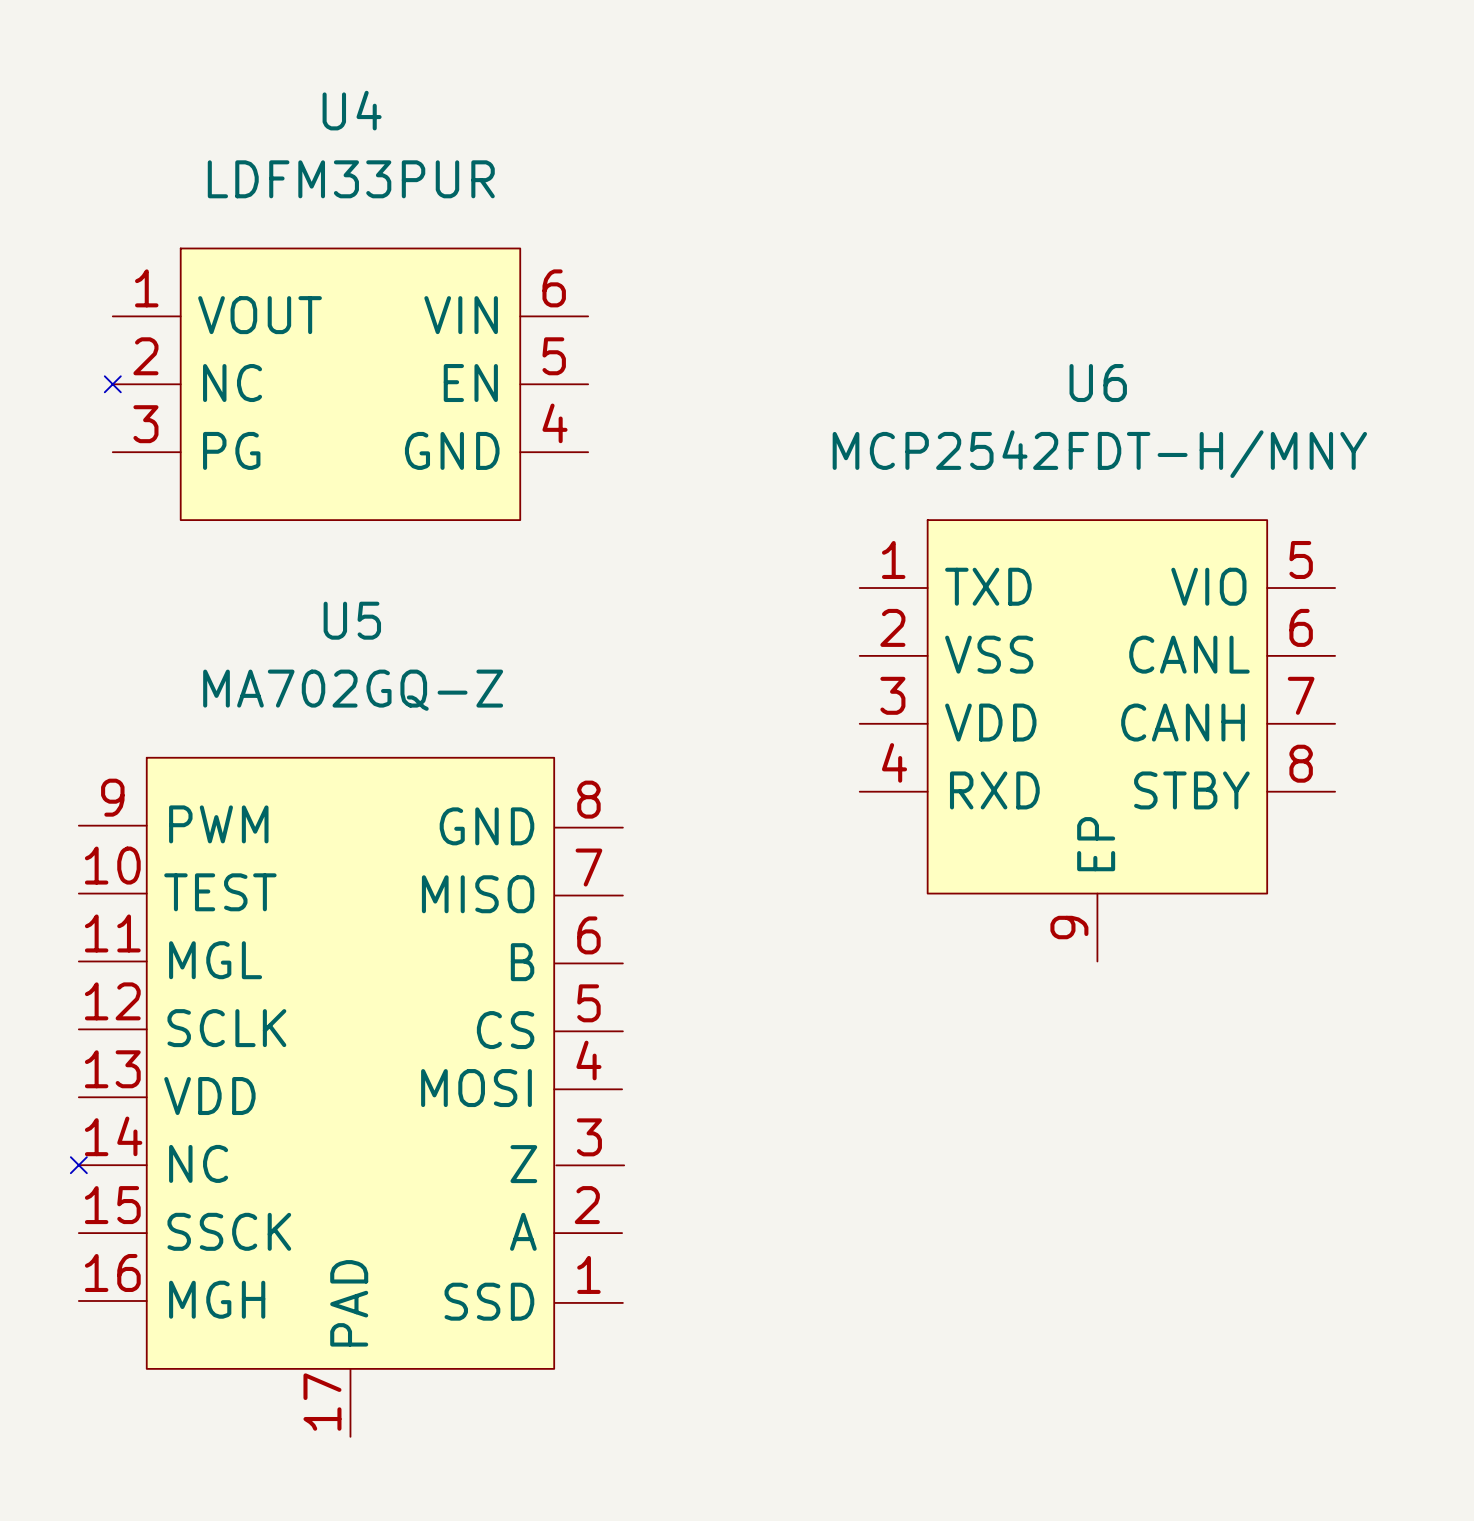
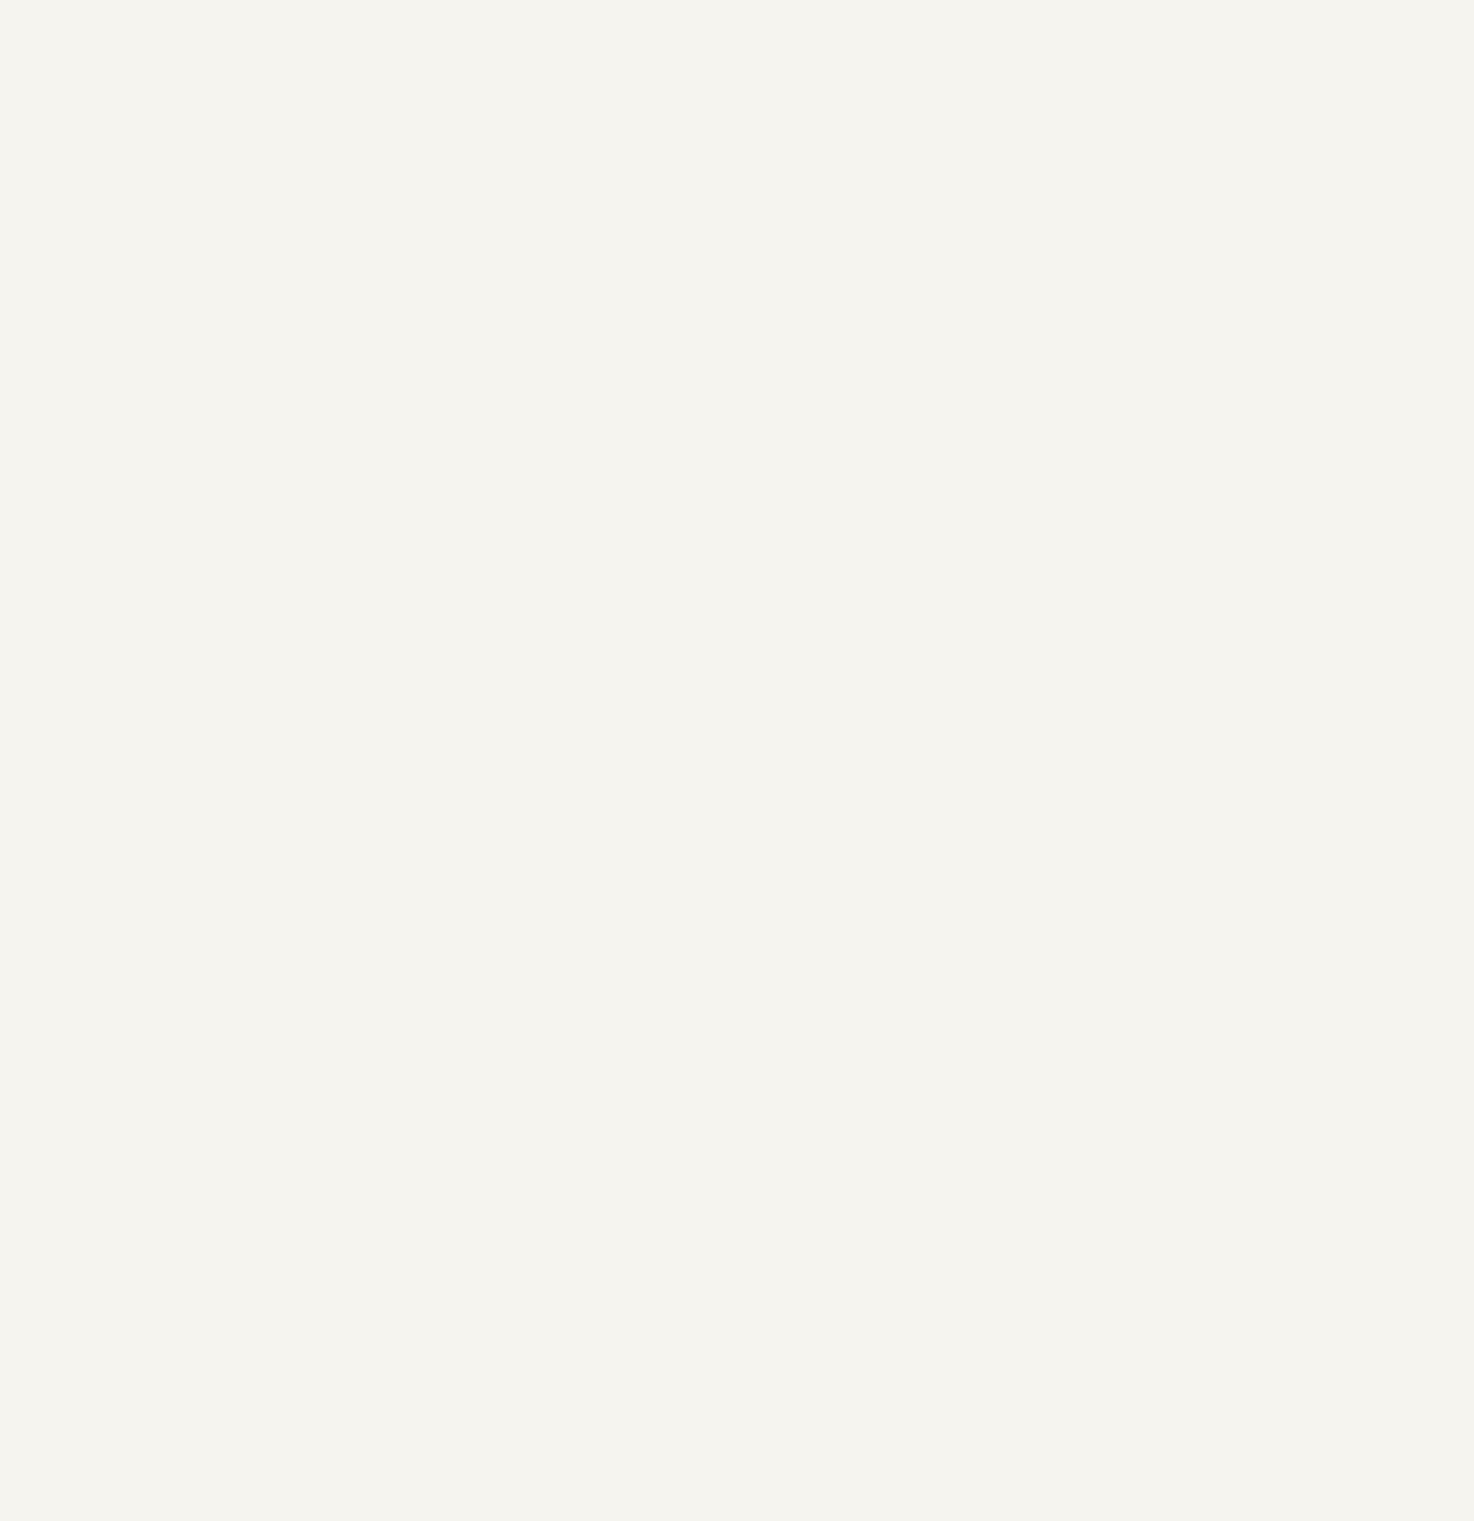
U4: LDFM33PUR (346, 384) -> none
U6: MCP2542FDT-H/MNY (1097, 740) -> none
U5: MA702GQ-Z (347, 1097) -> none

